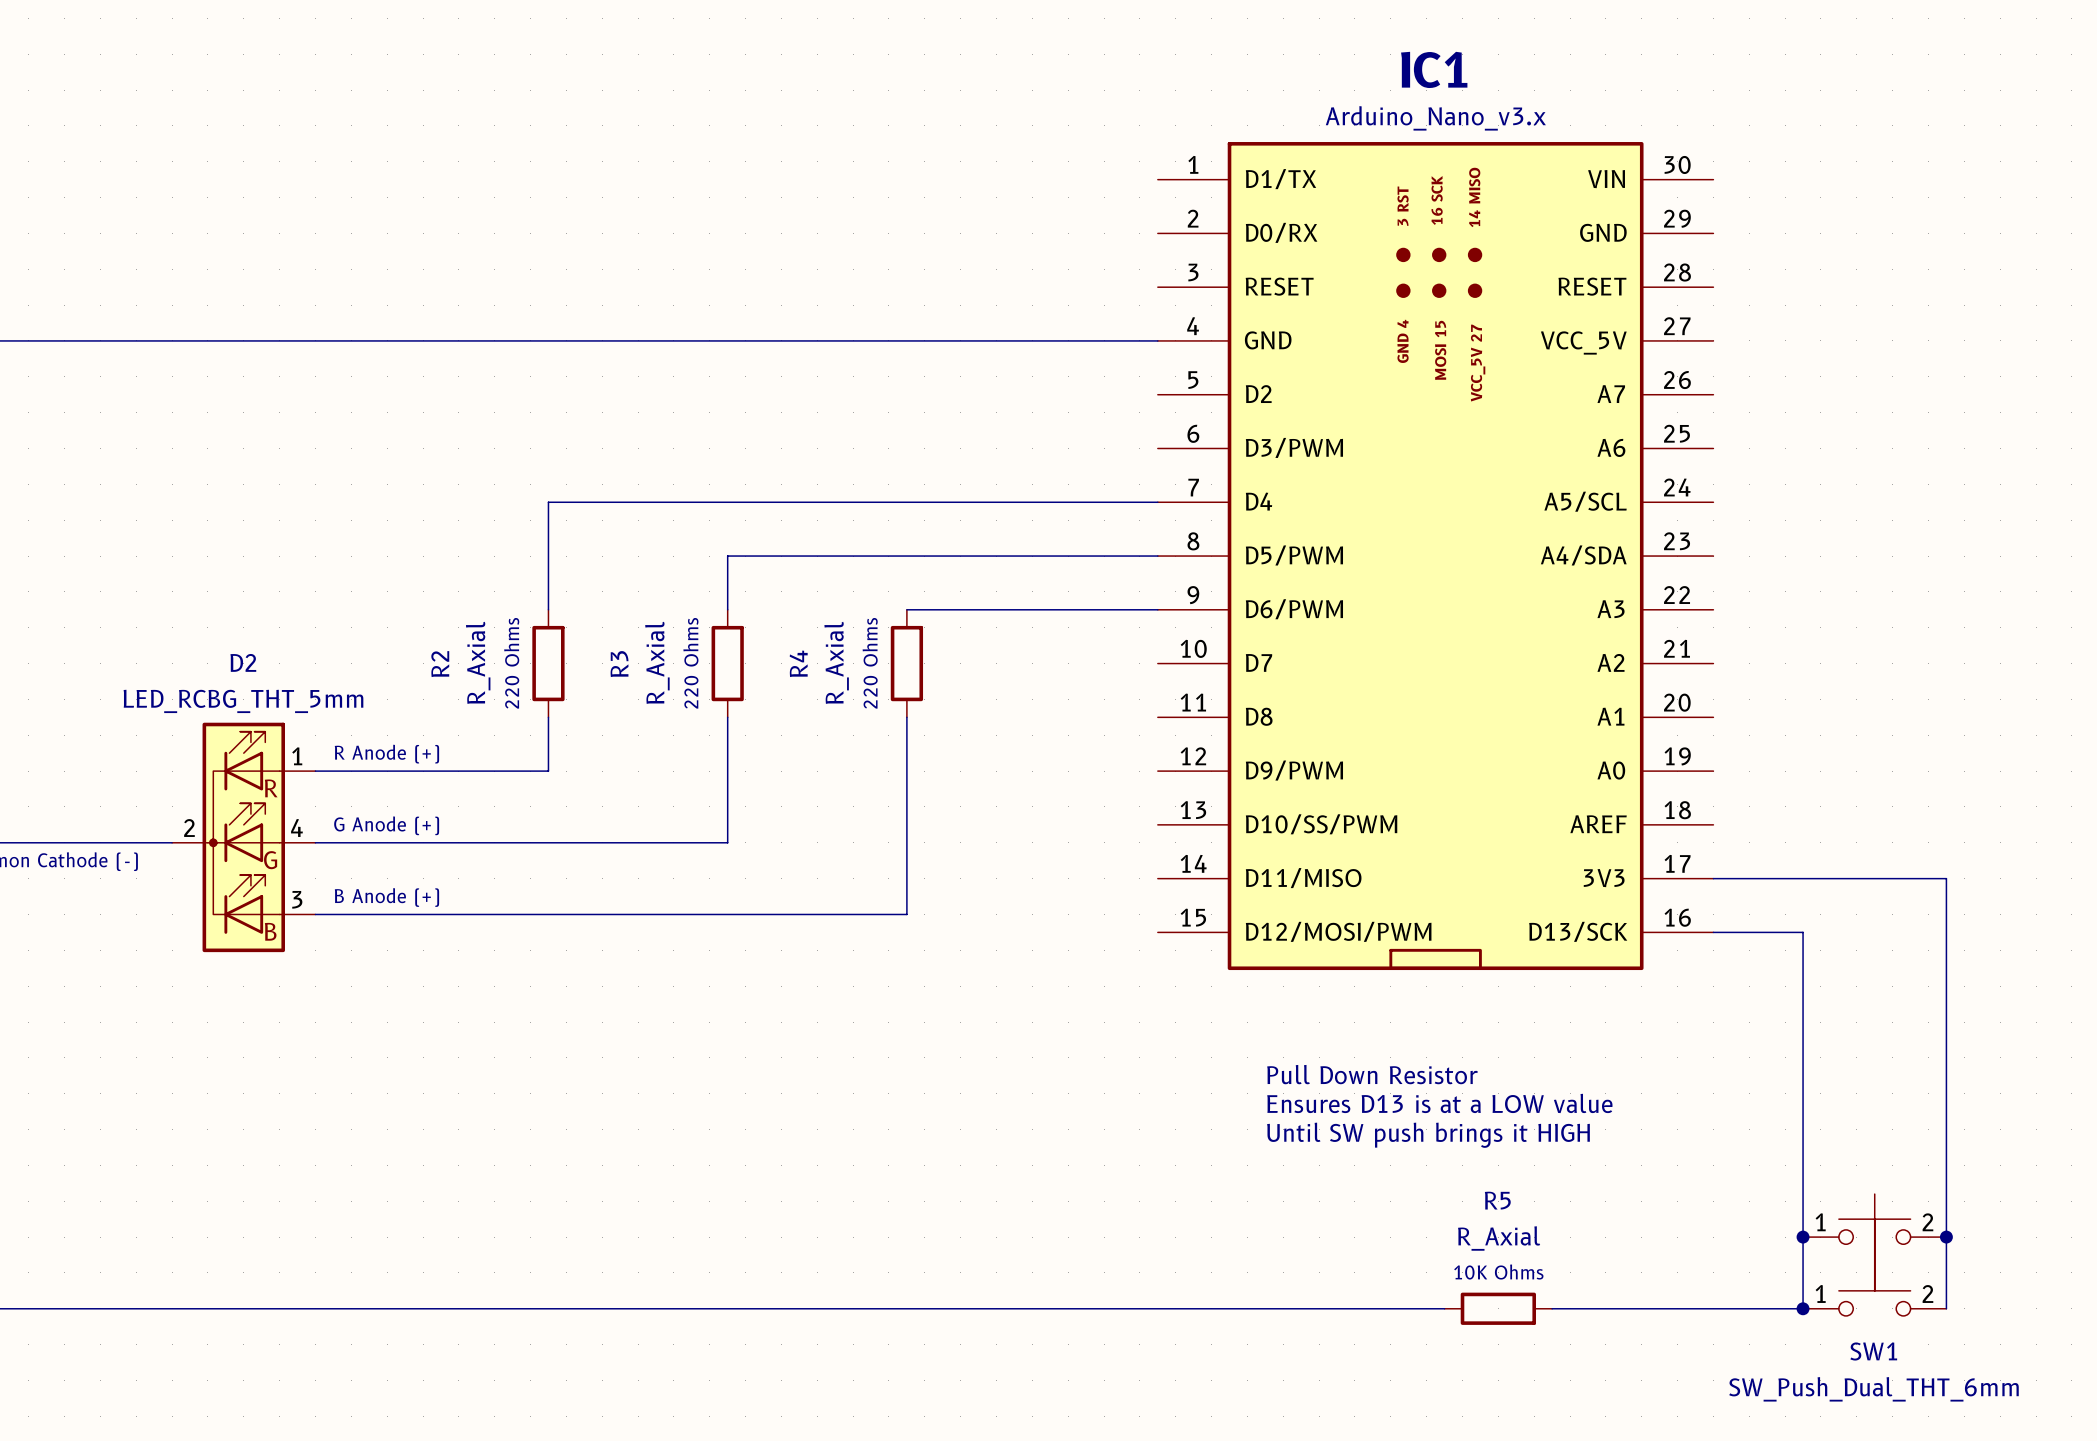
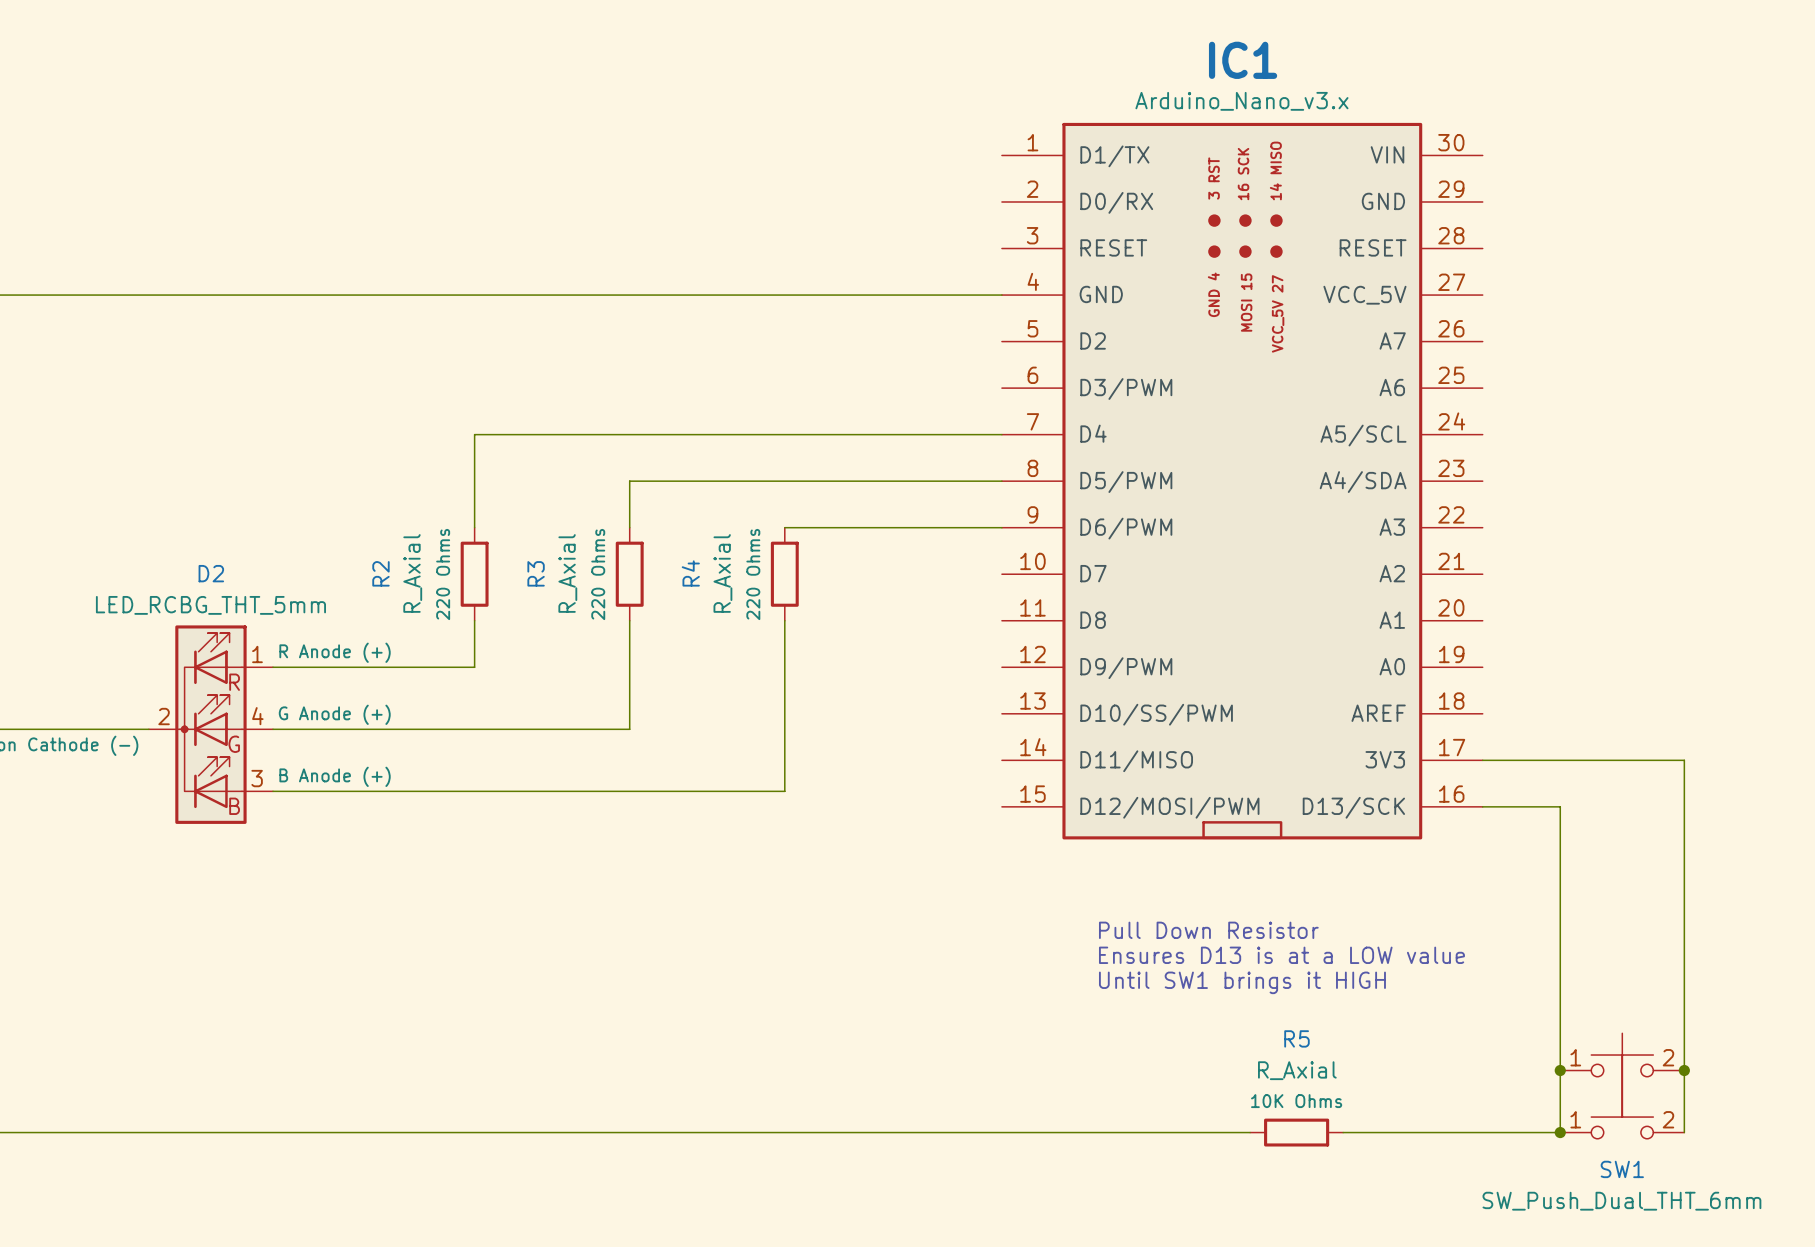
text: Until SW push brings it HIGH (1428, 1135) -> Until SW1 brings it HIGH (1242, 982)

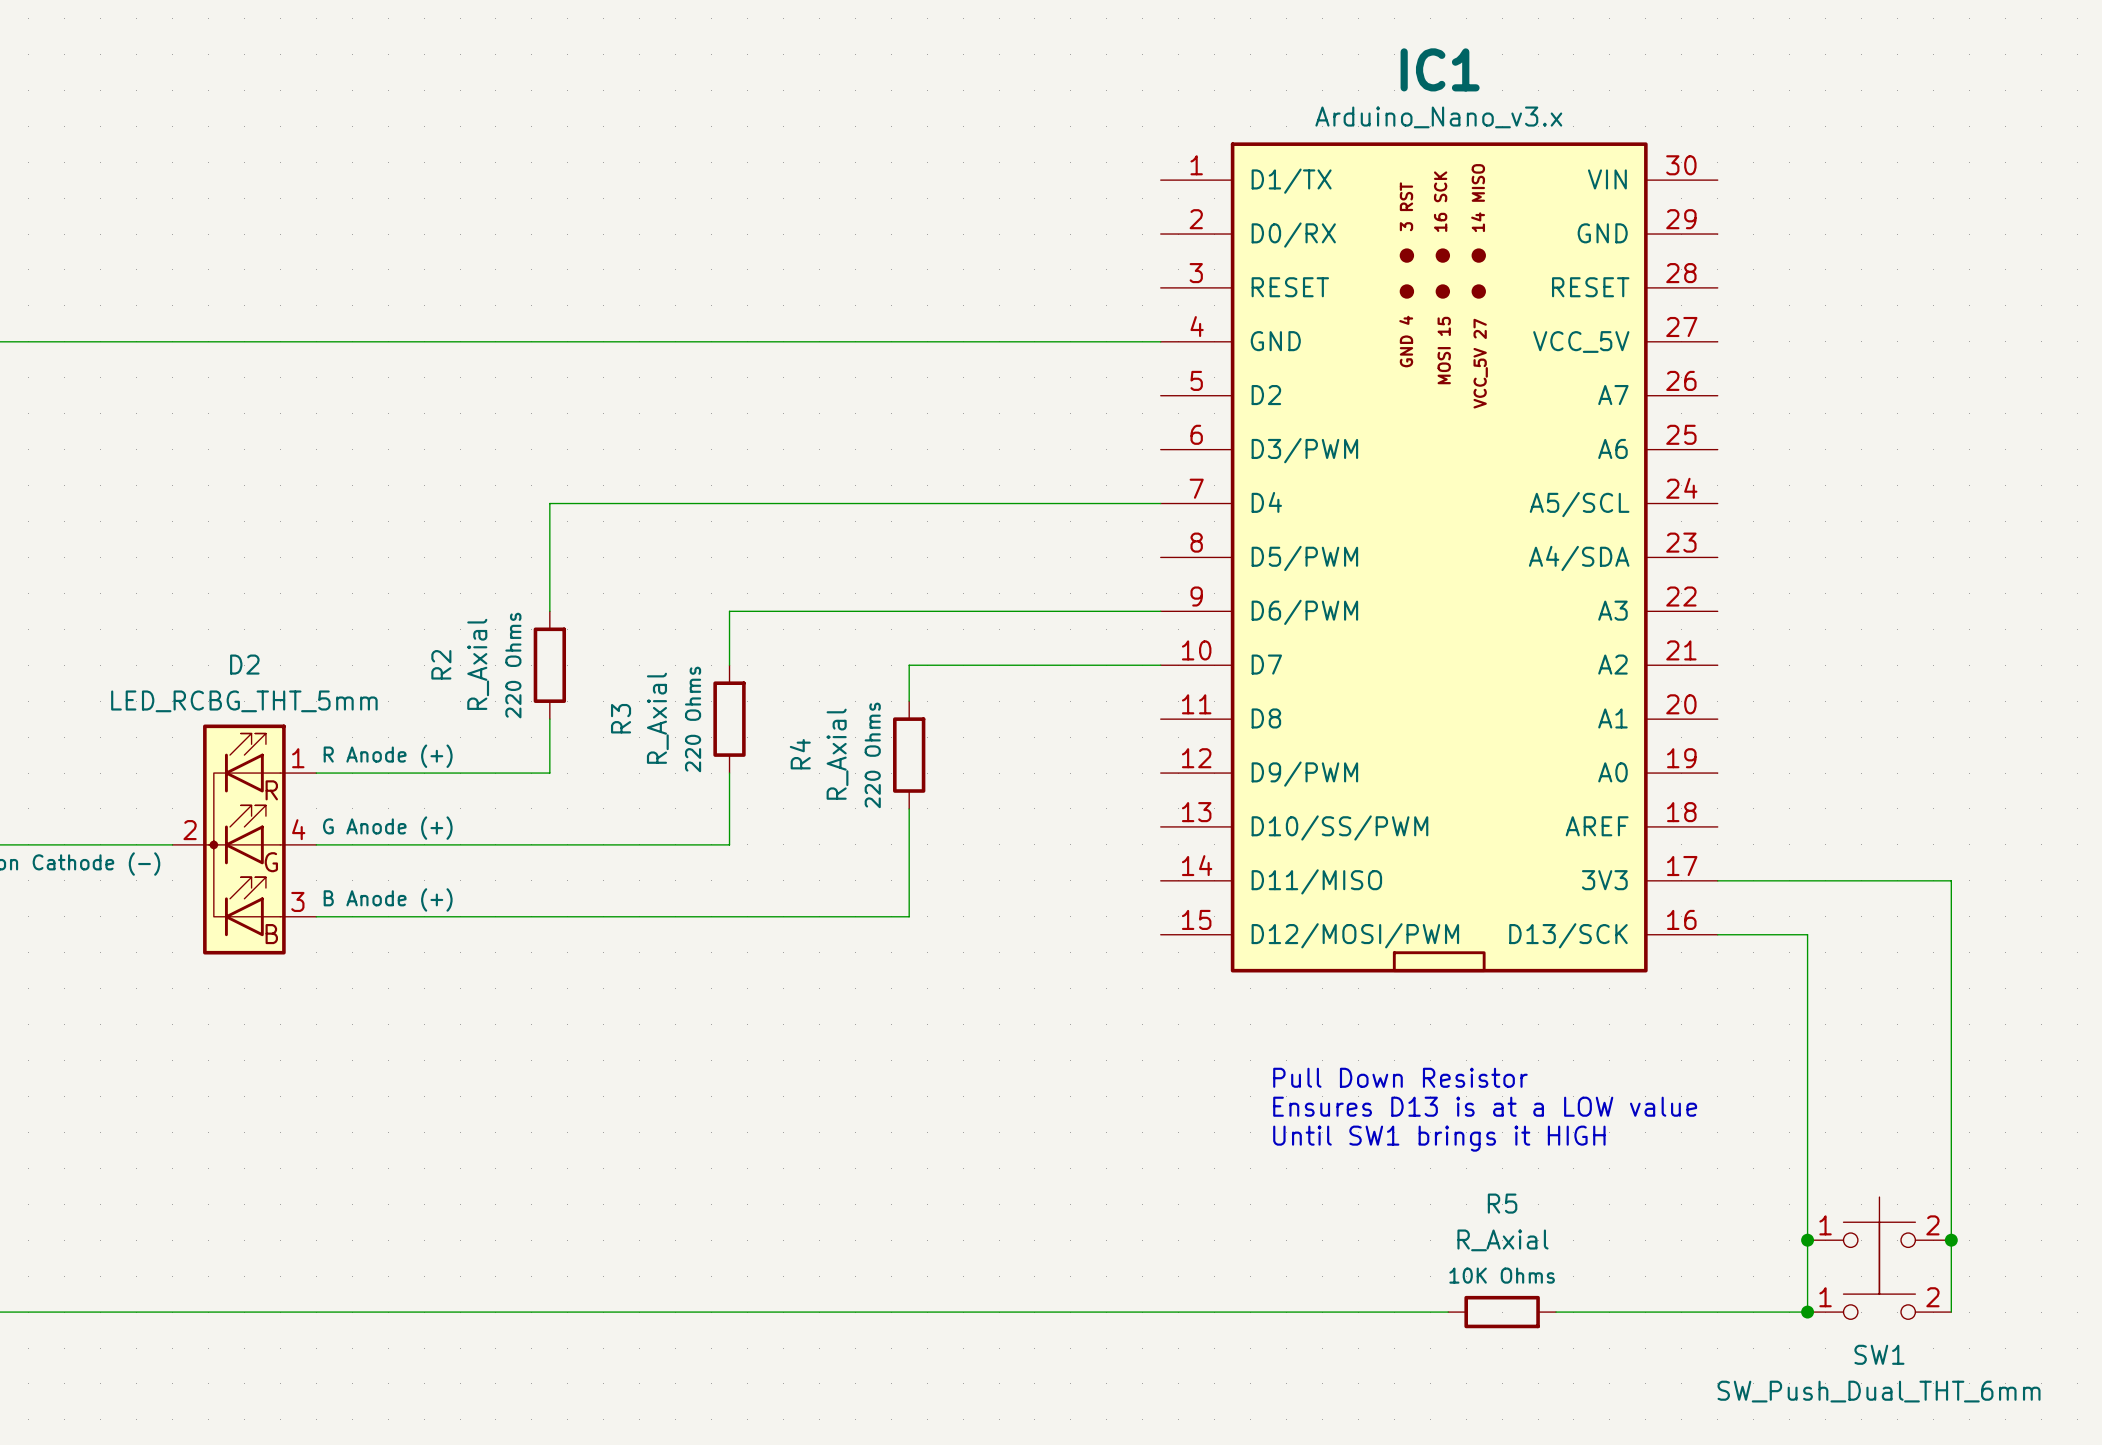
wire: (1001, 481) (629, 481) (629, 527) -> none
wire: none -> (909, 611) (729, 611) (729, 665)
R3 position: (629, 574) -> (729, 719)
R4 position: (784, 574) -> (909, 755)
wire: none -> (1160, 665) (909, 665) (909, 701)
wire: (629, 620) (629, 667) -> none
wire: (784, 620) (784, 698) -> none

